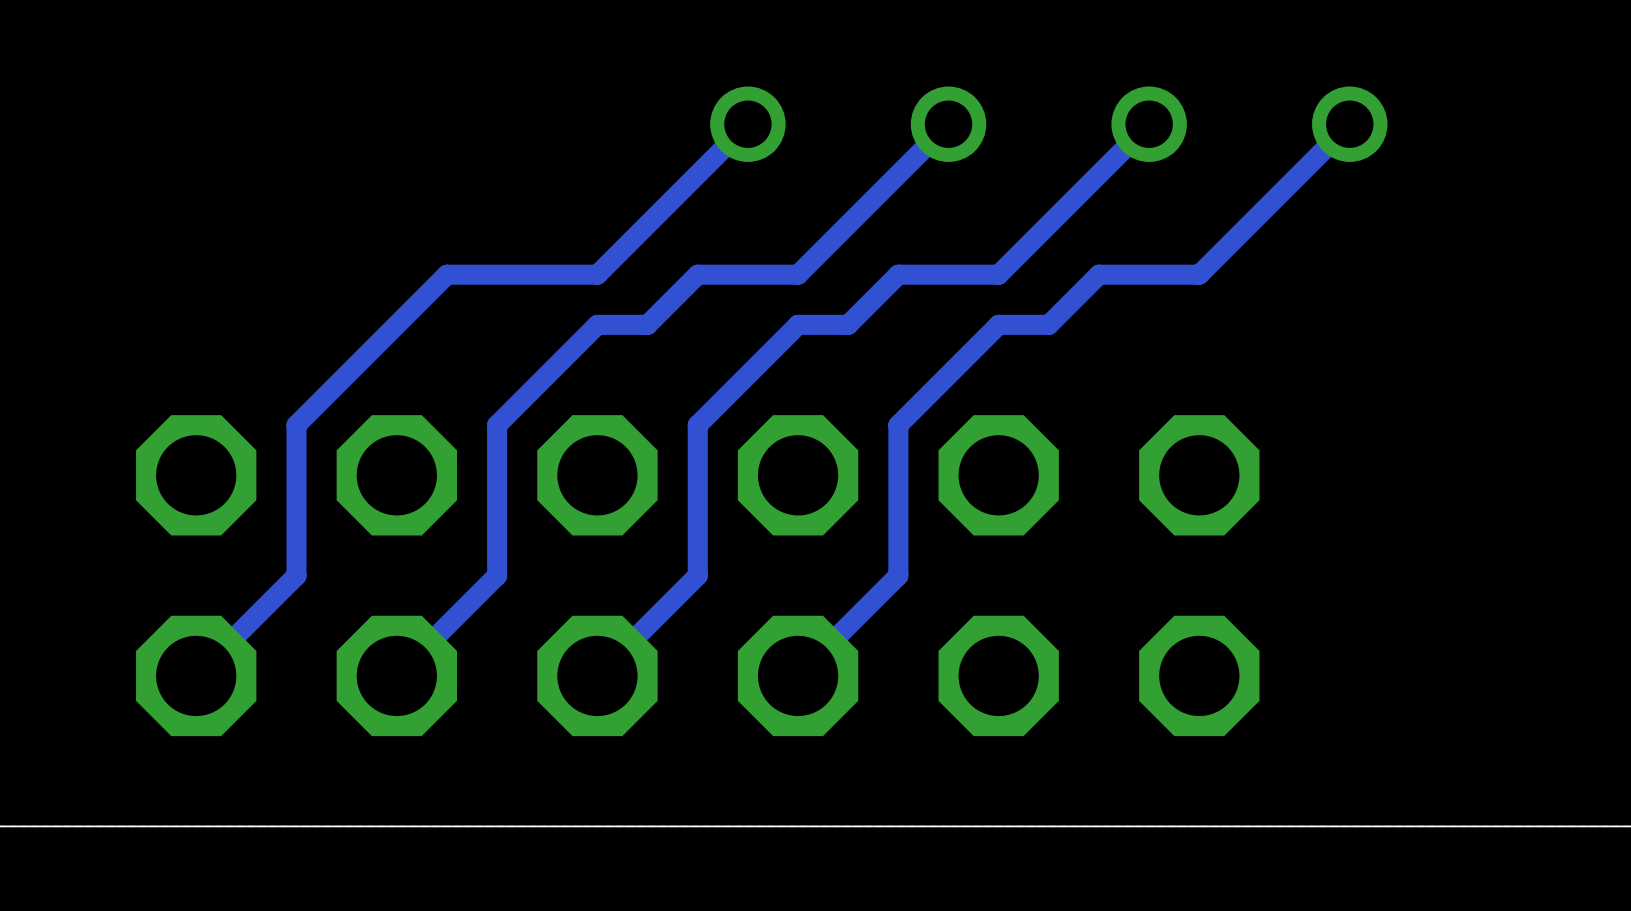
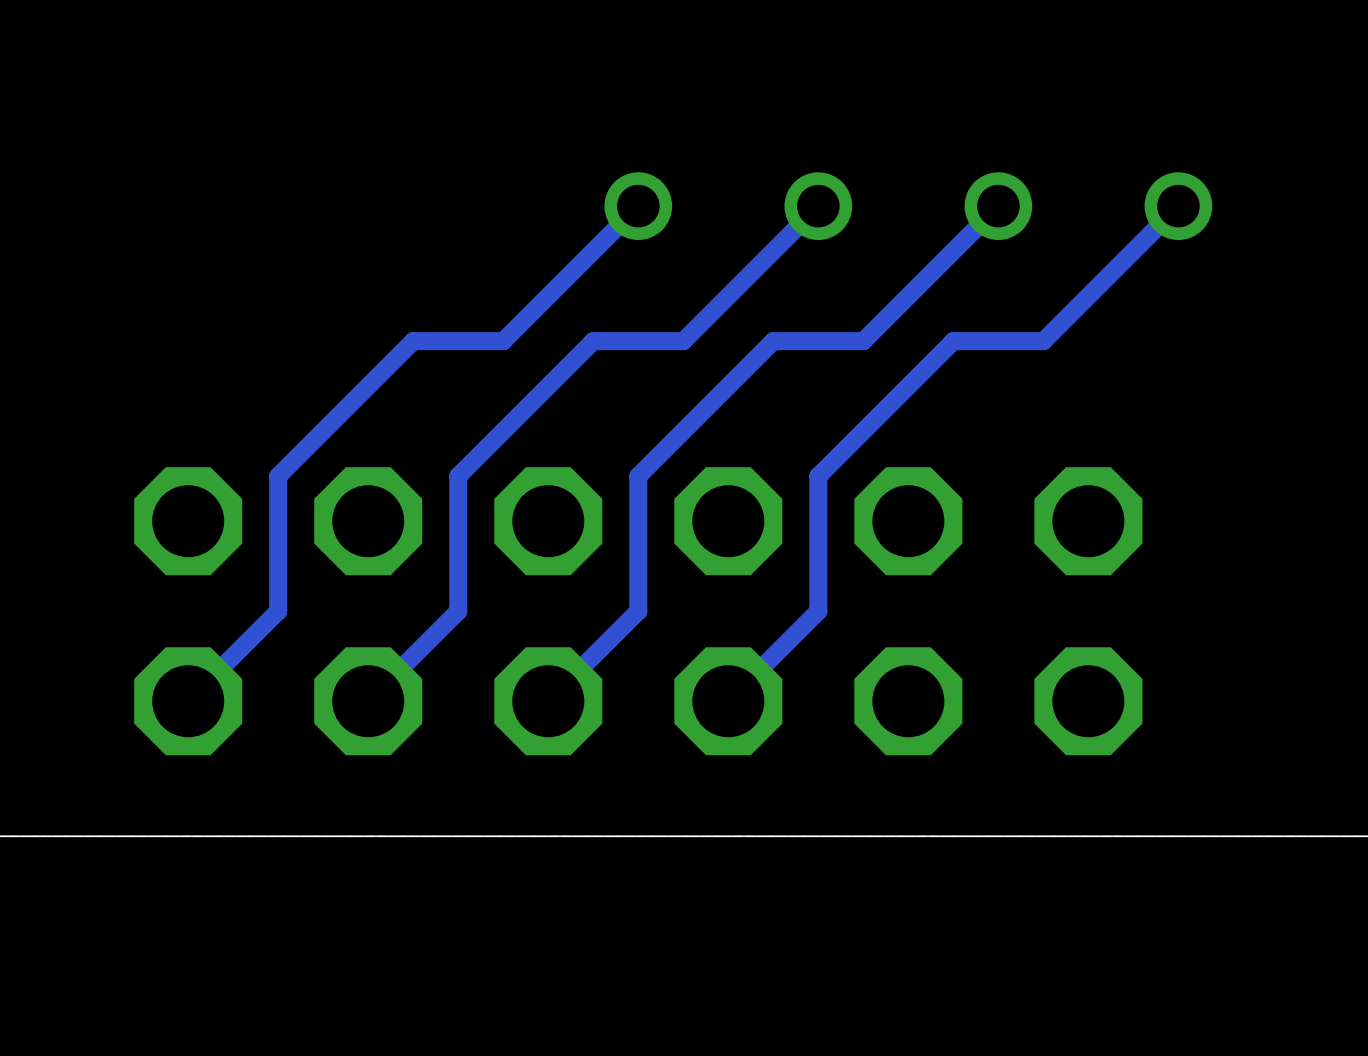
track: (497, 274) (446, 274) (296, 425) (296, 575) (196, 675) -> (413, 341) (278, 476) (278, 611) (188, 701)
track: (647, 324) (597, 324) (497, 425) (497, 575) (396, 675) -> (548, 386) (458, 476) (458, 611) (368, 701)
track: (848, 324) (798, 324) (697, 425) (697, 575) (597, 675) -> (728, 386) (638, 476) (638, 611) (548, 701)
track: (1048, 324) (998, 324) (898, 425) (898, 575) (798, 675) -> (908, 386) (818, 476) (818, 611) (728, 701)
part position: (697, 575) -> (638, 611)

